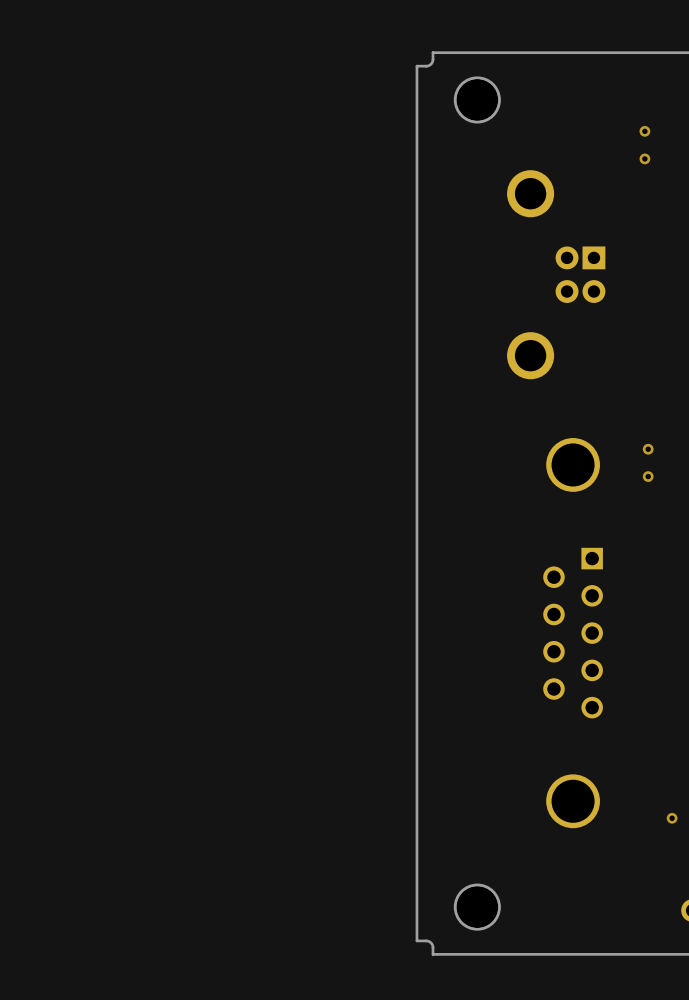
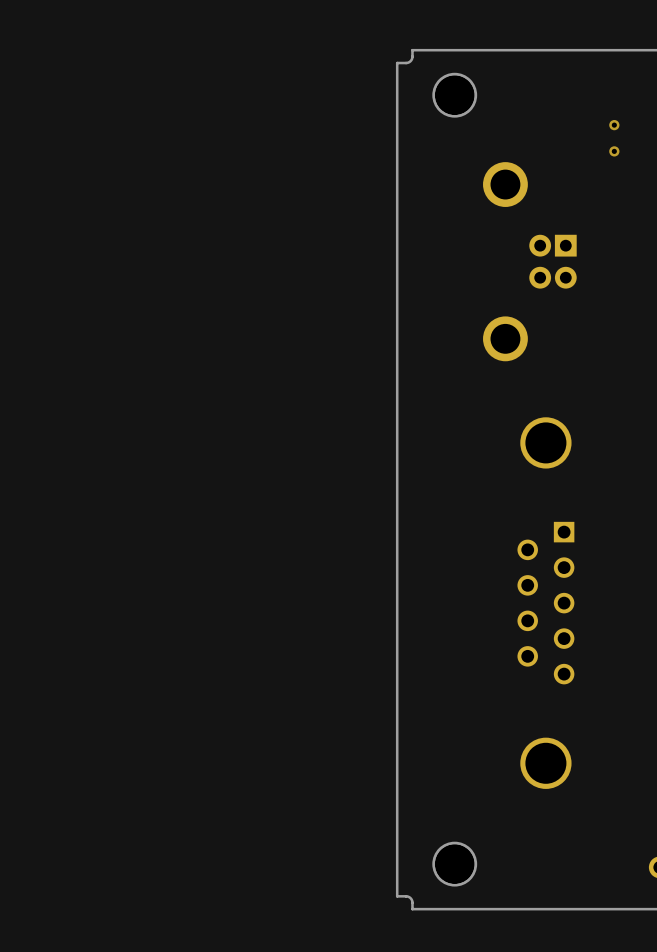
via: (648, 449) -> none
via: (648, 476) -> none
via: (672, 818) -> none

